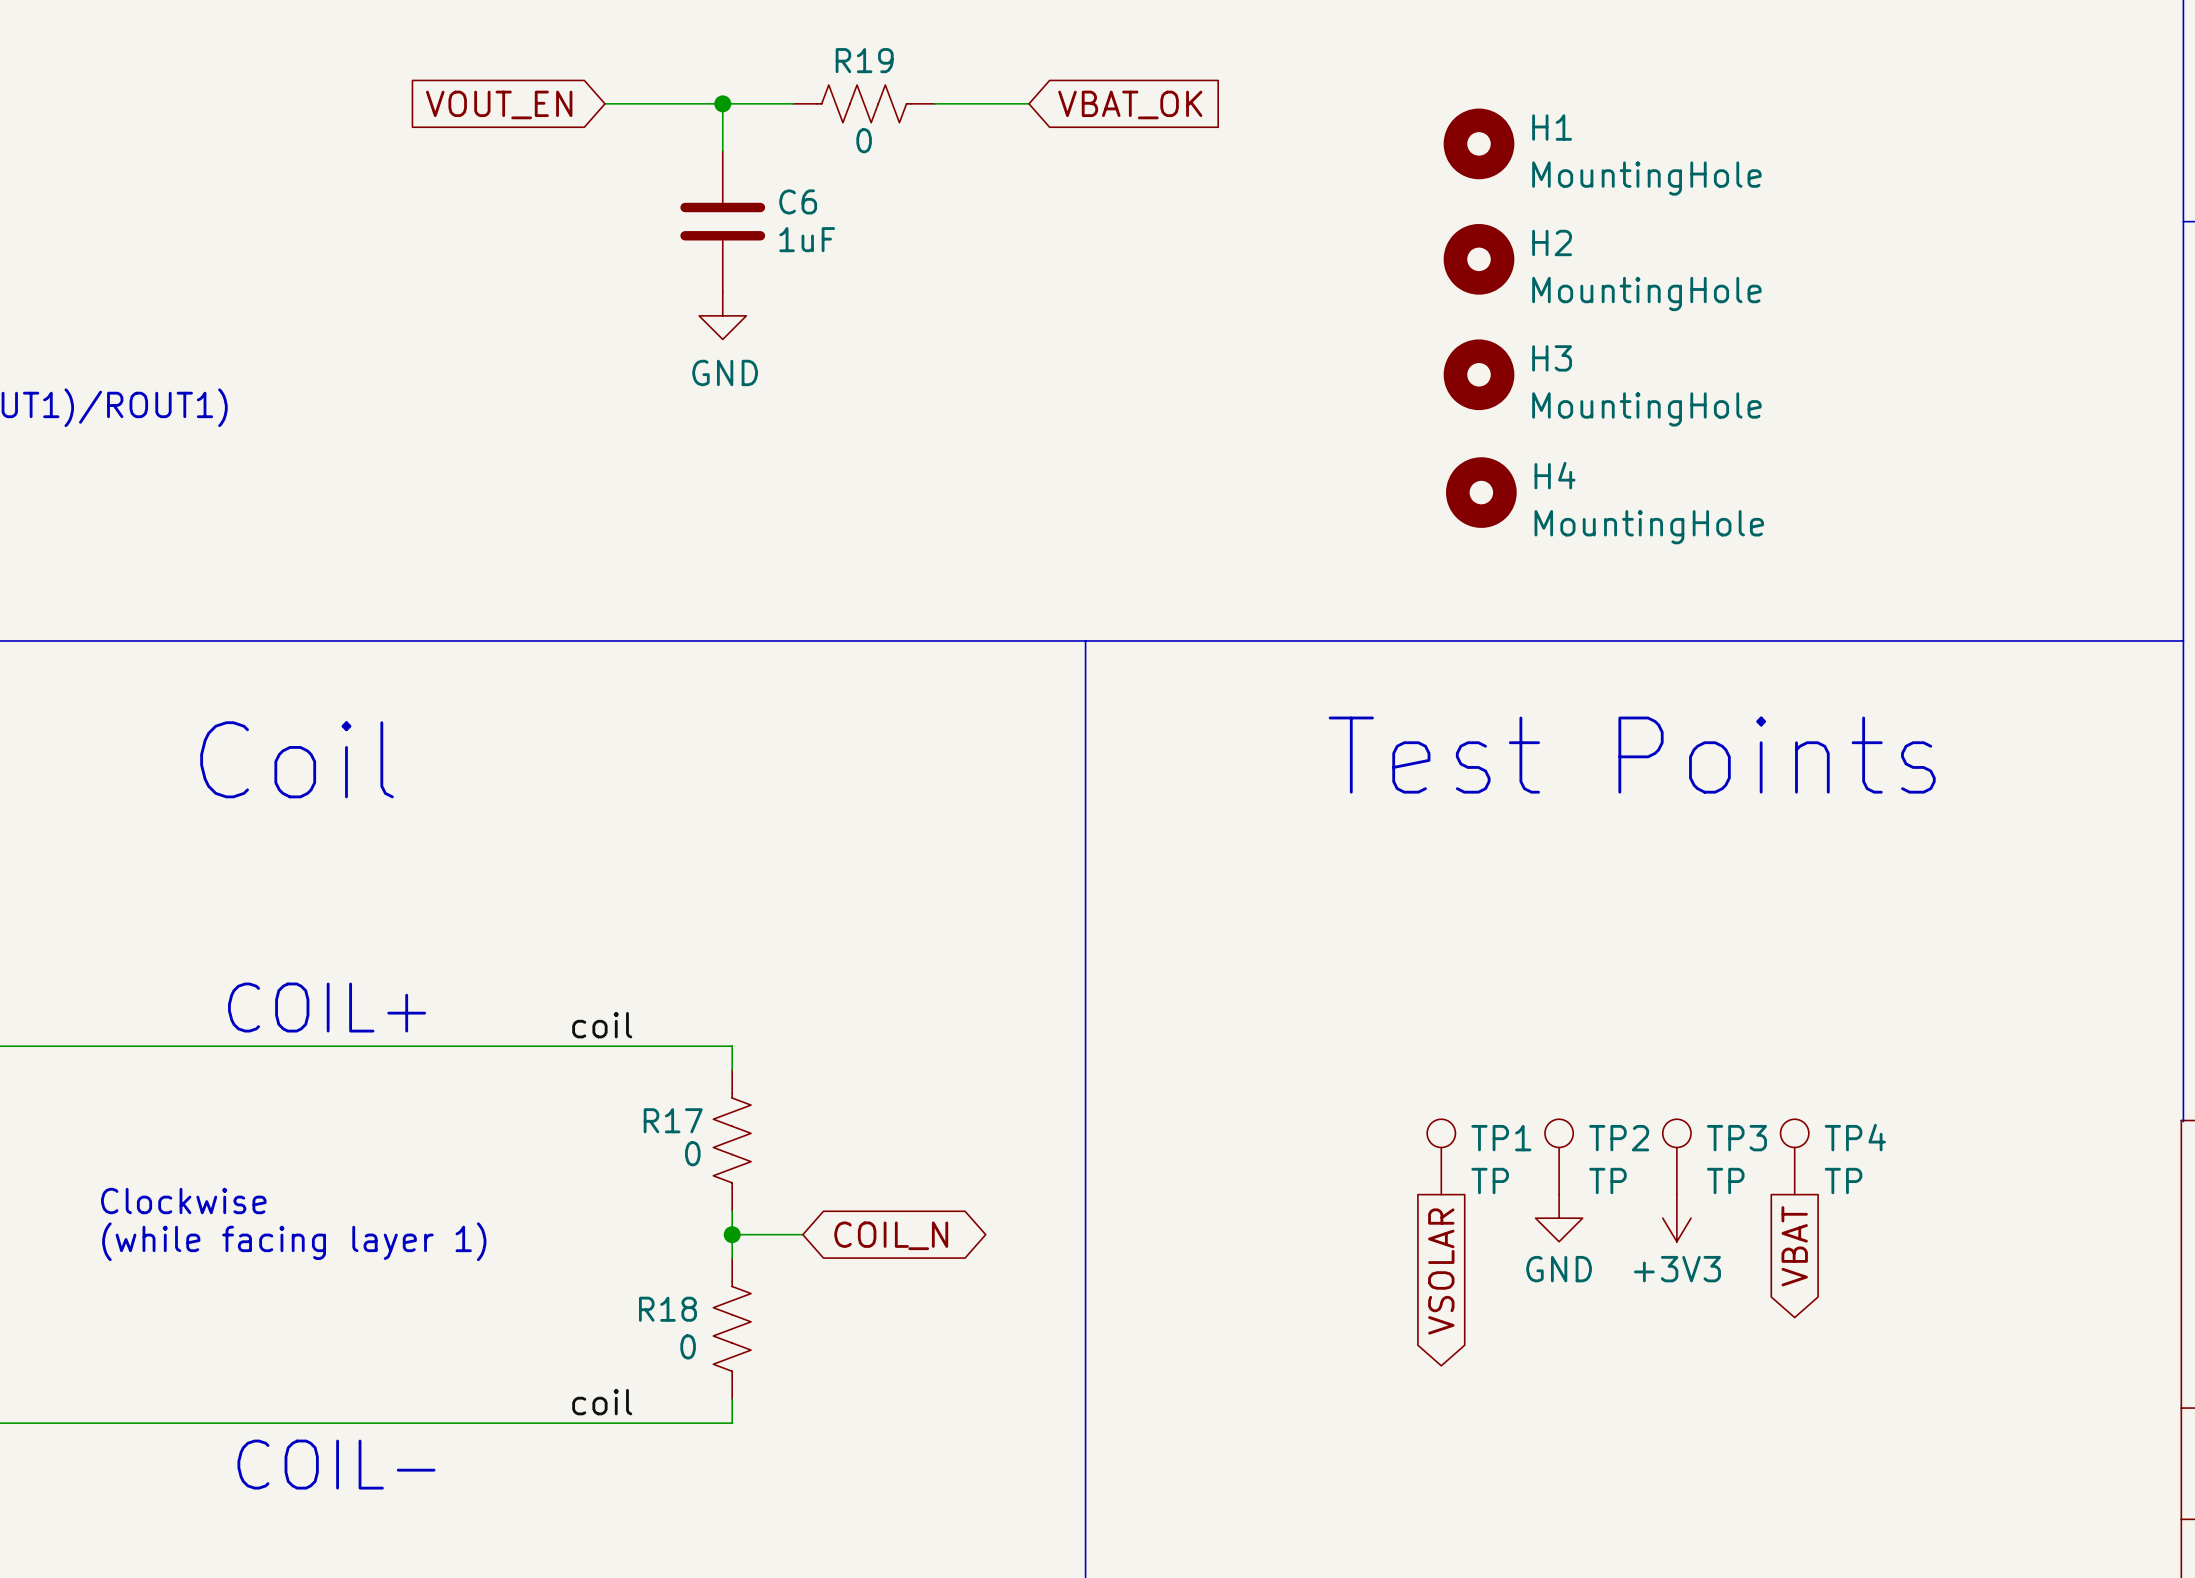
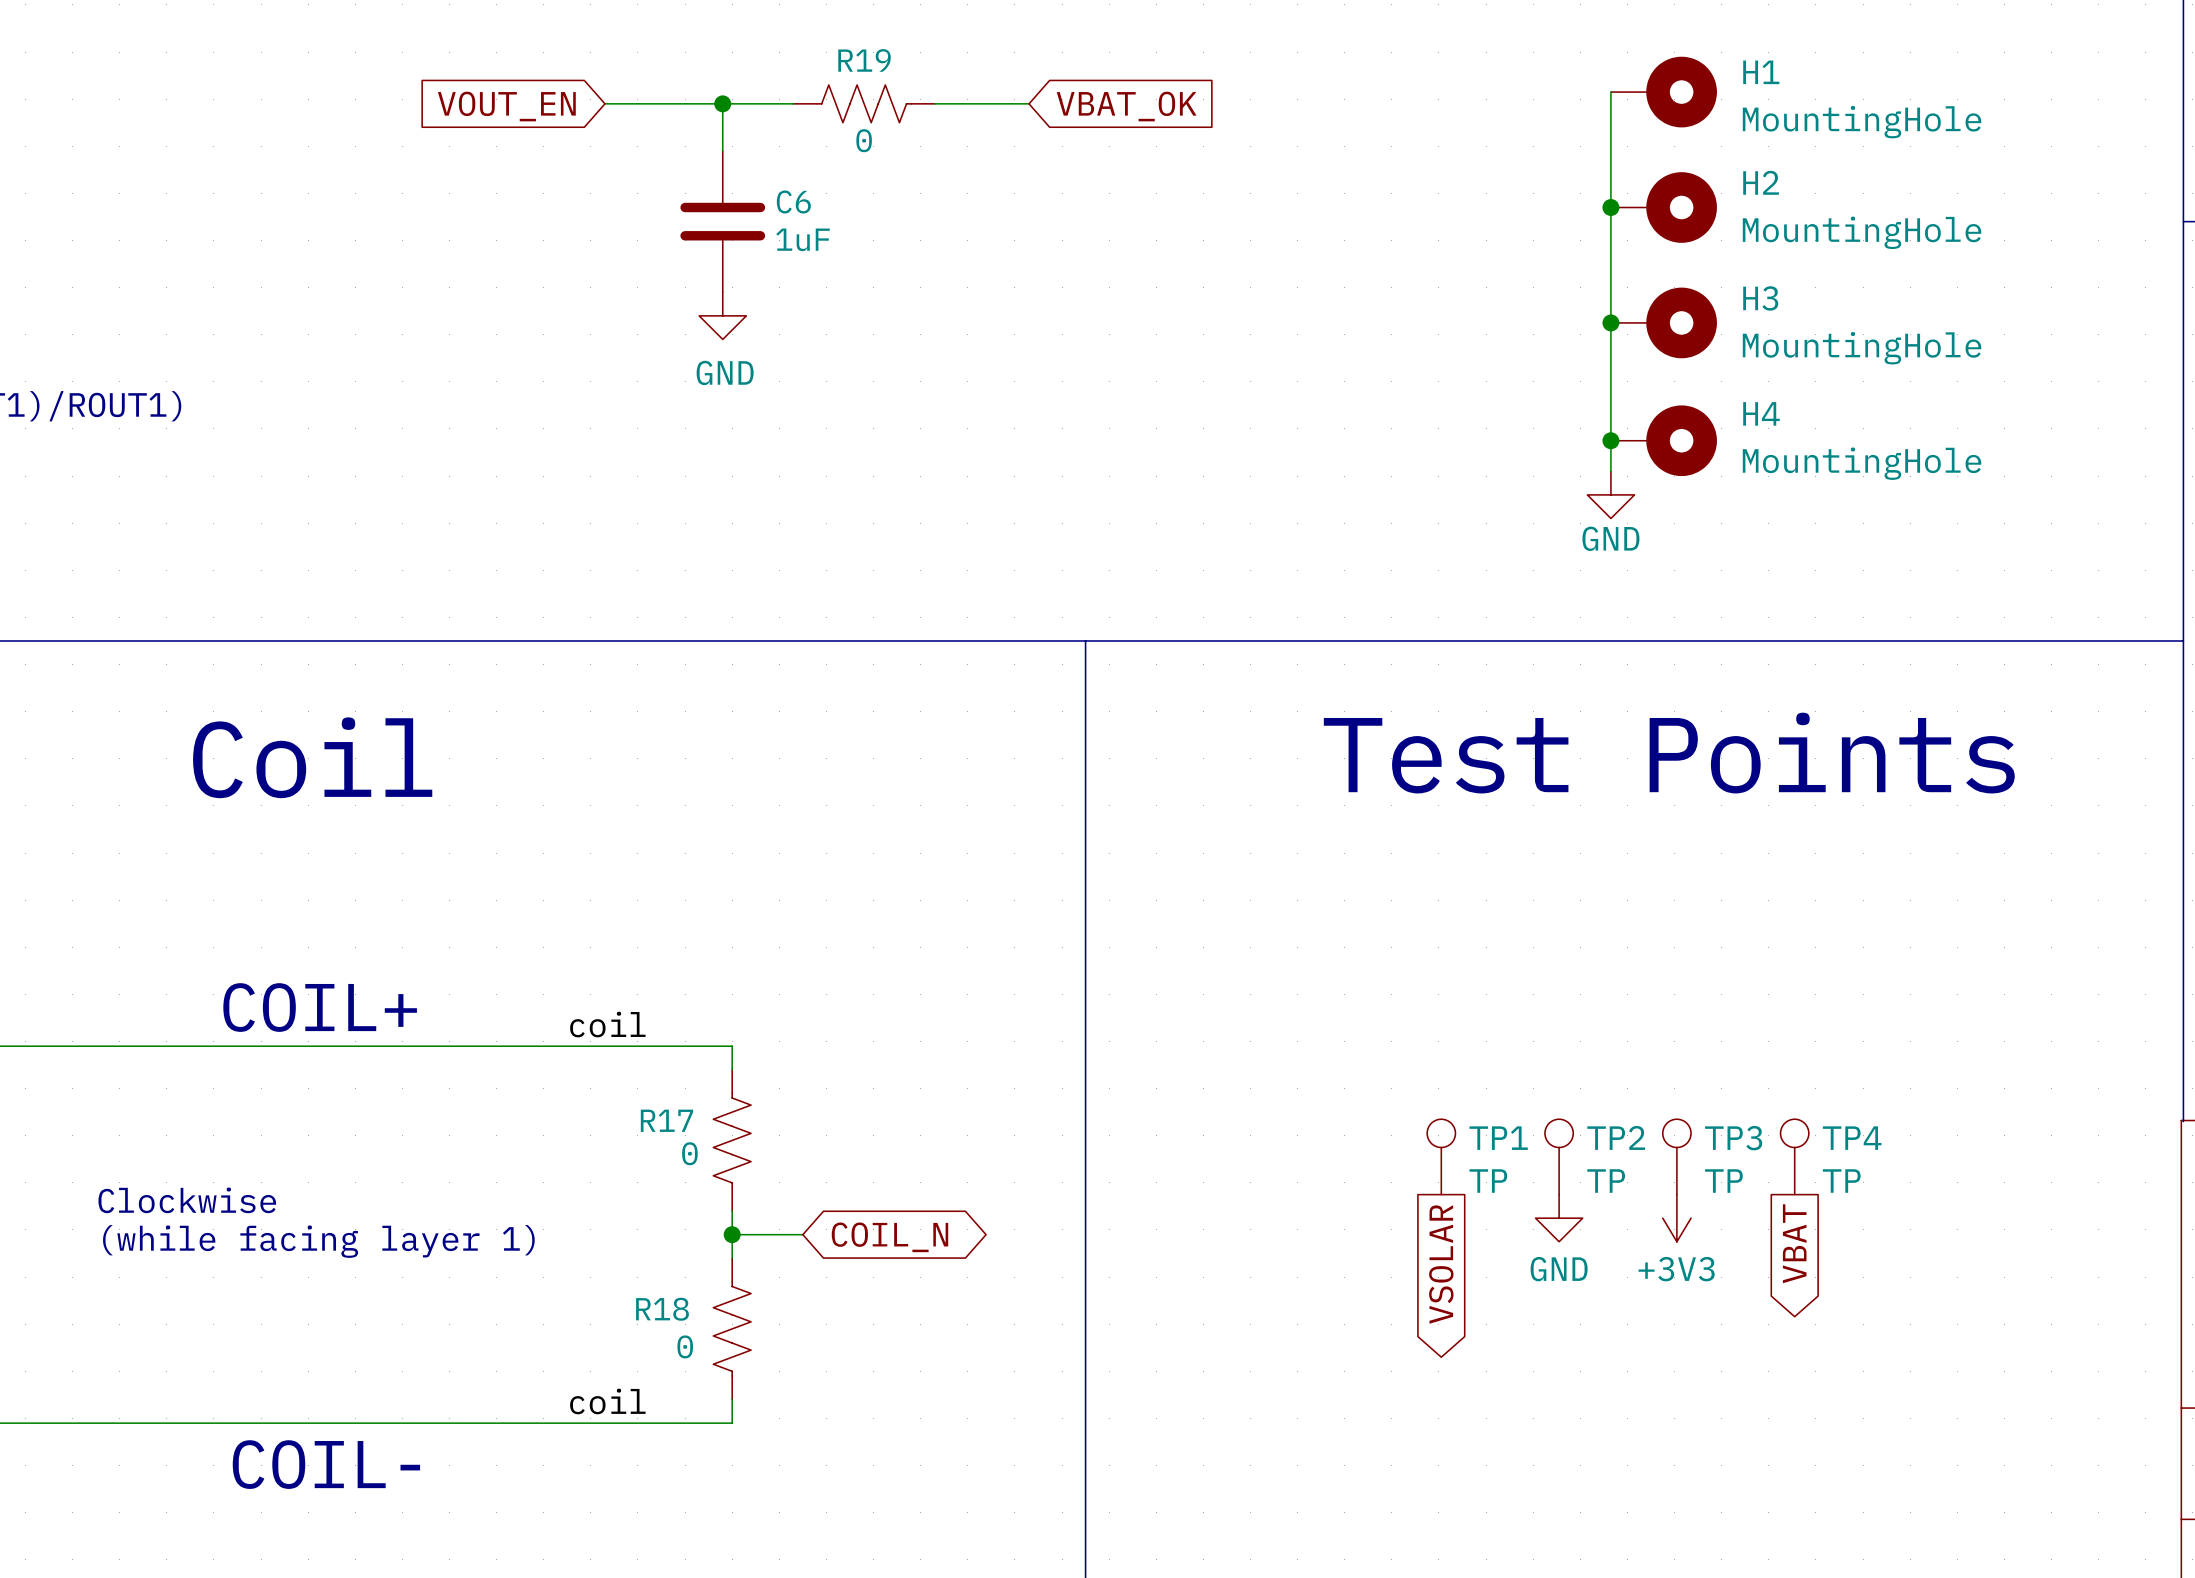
wire: none -> (1610, 92) (1610, 471)
H1 symbol: [1443, 108, 1515, 180] -> [1610, 56, 1717, 128]
junction: none -> (1610, 207)
H2 symbol: [1443, 224, 1515, 295] -> [1610, 172, 1717, 243]
junction: none -> (1610, 322)
H3 symbol: [1443, 339, 1515, 411] -> [1610, 287, 1717, 359]
junction: none -> (1610, 440)
H4 symbol: [1446, 457, 1517, 528] -> [1610, 405, 1717, 477]
power symbol: none -> GND (1610, 494)

